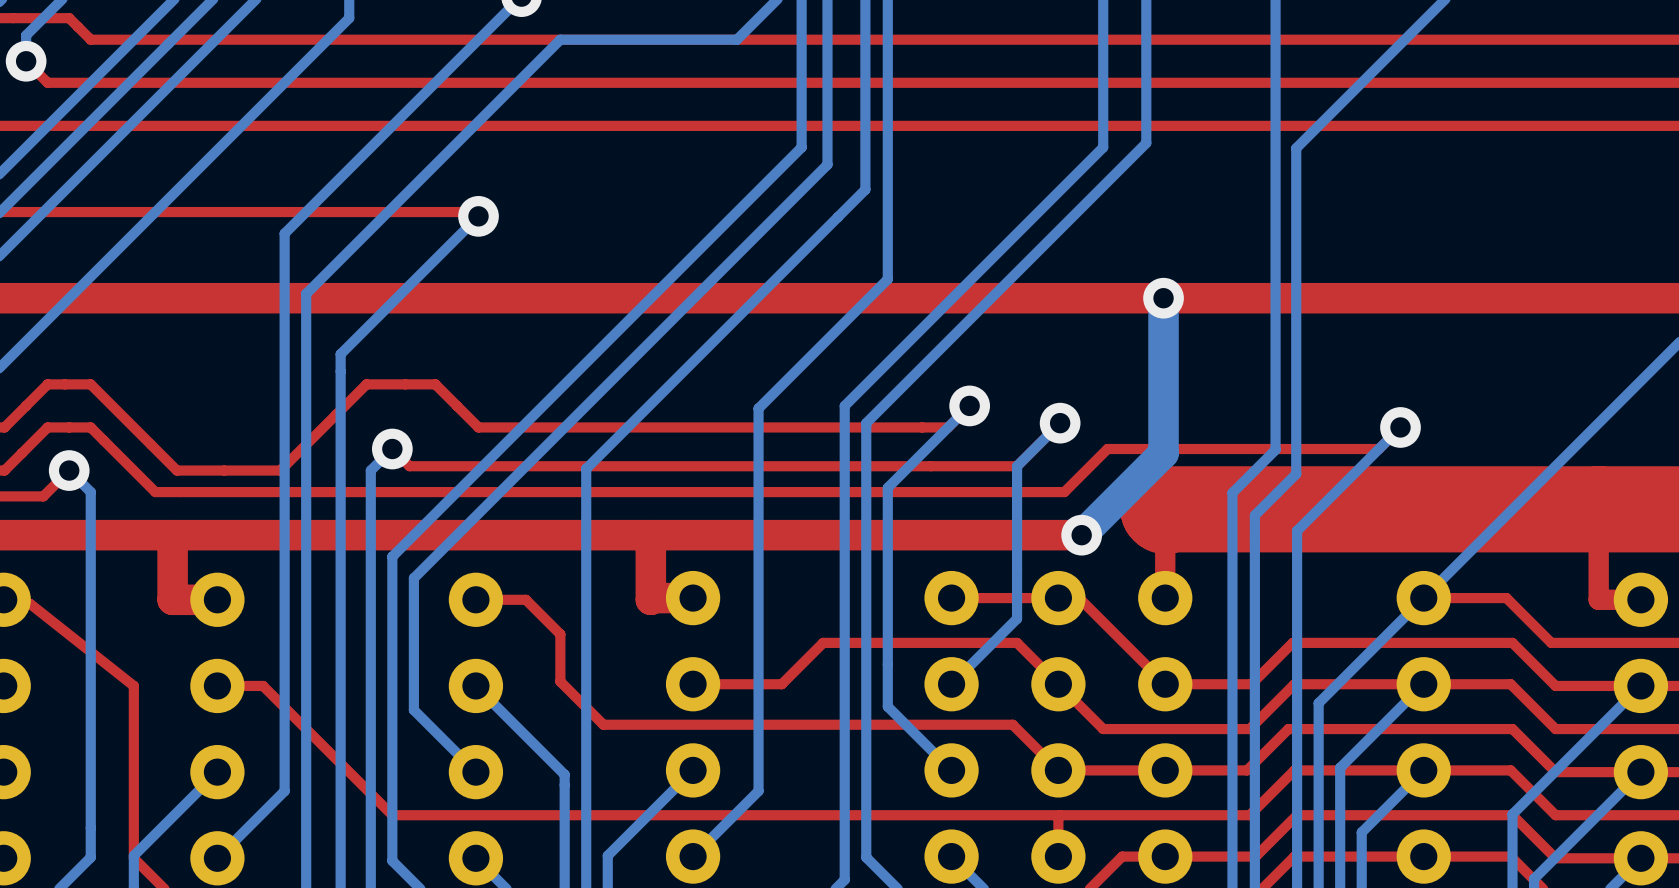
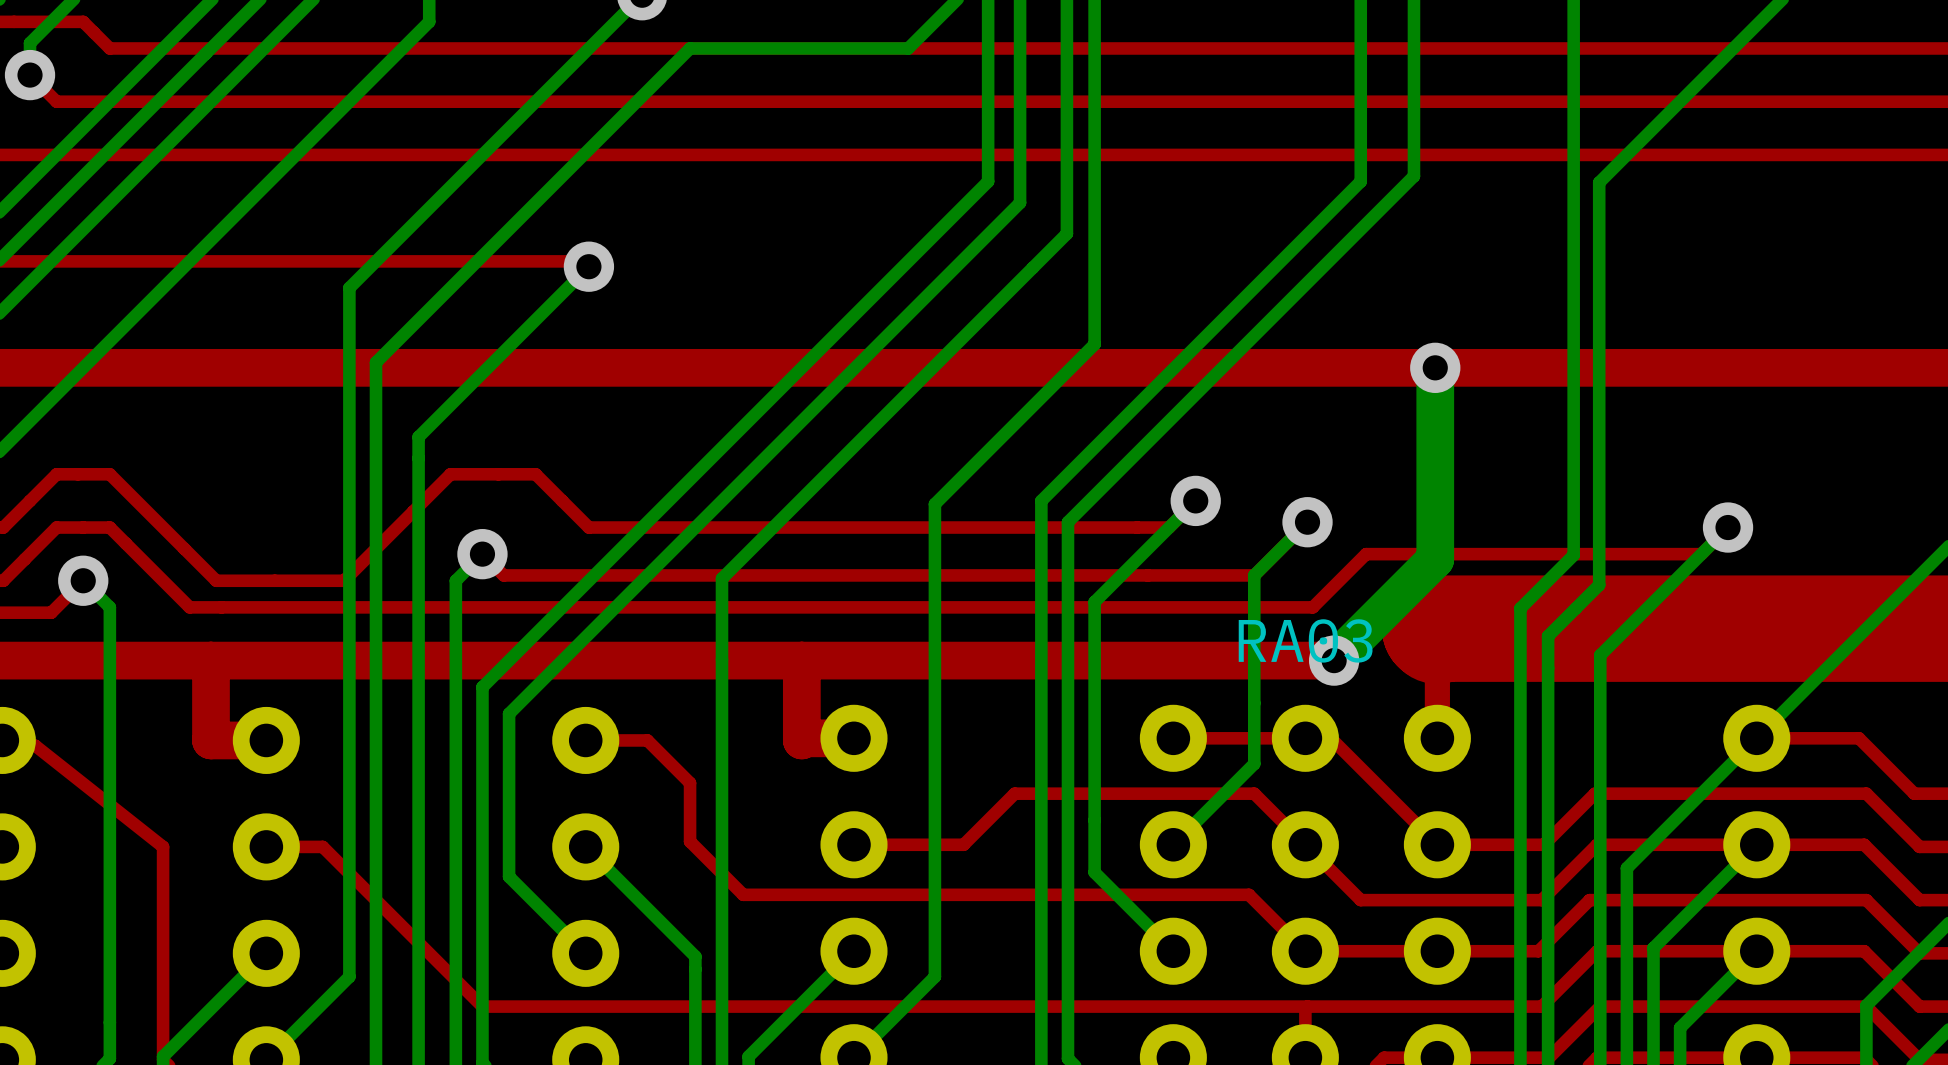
RA03 name: none -> RA03 (1305, 640)

